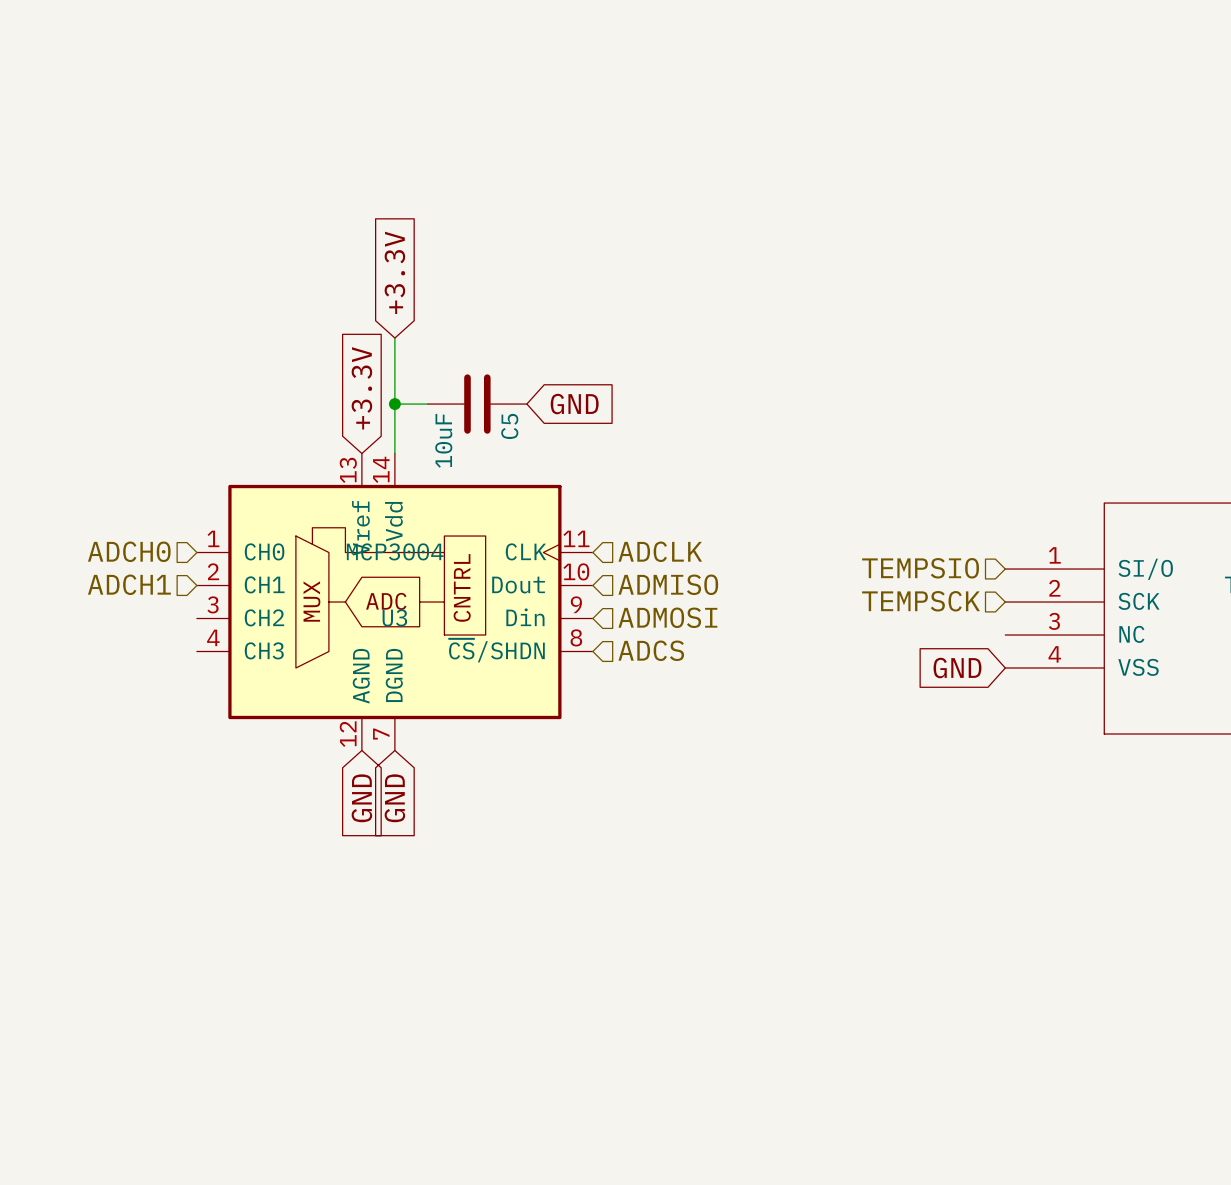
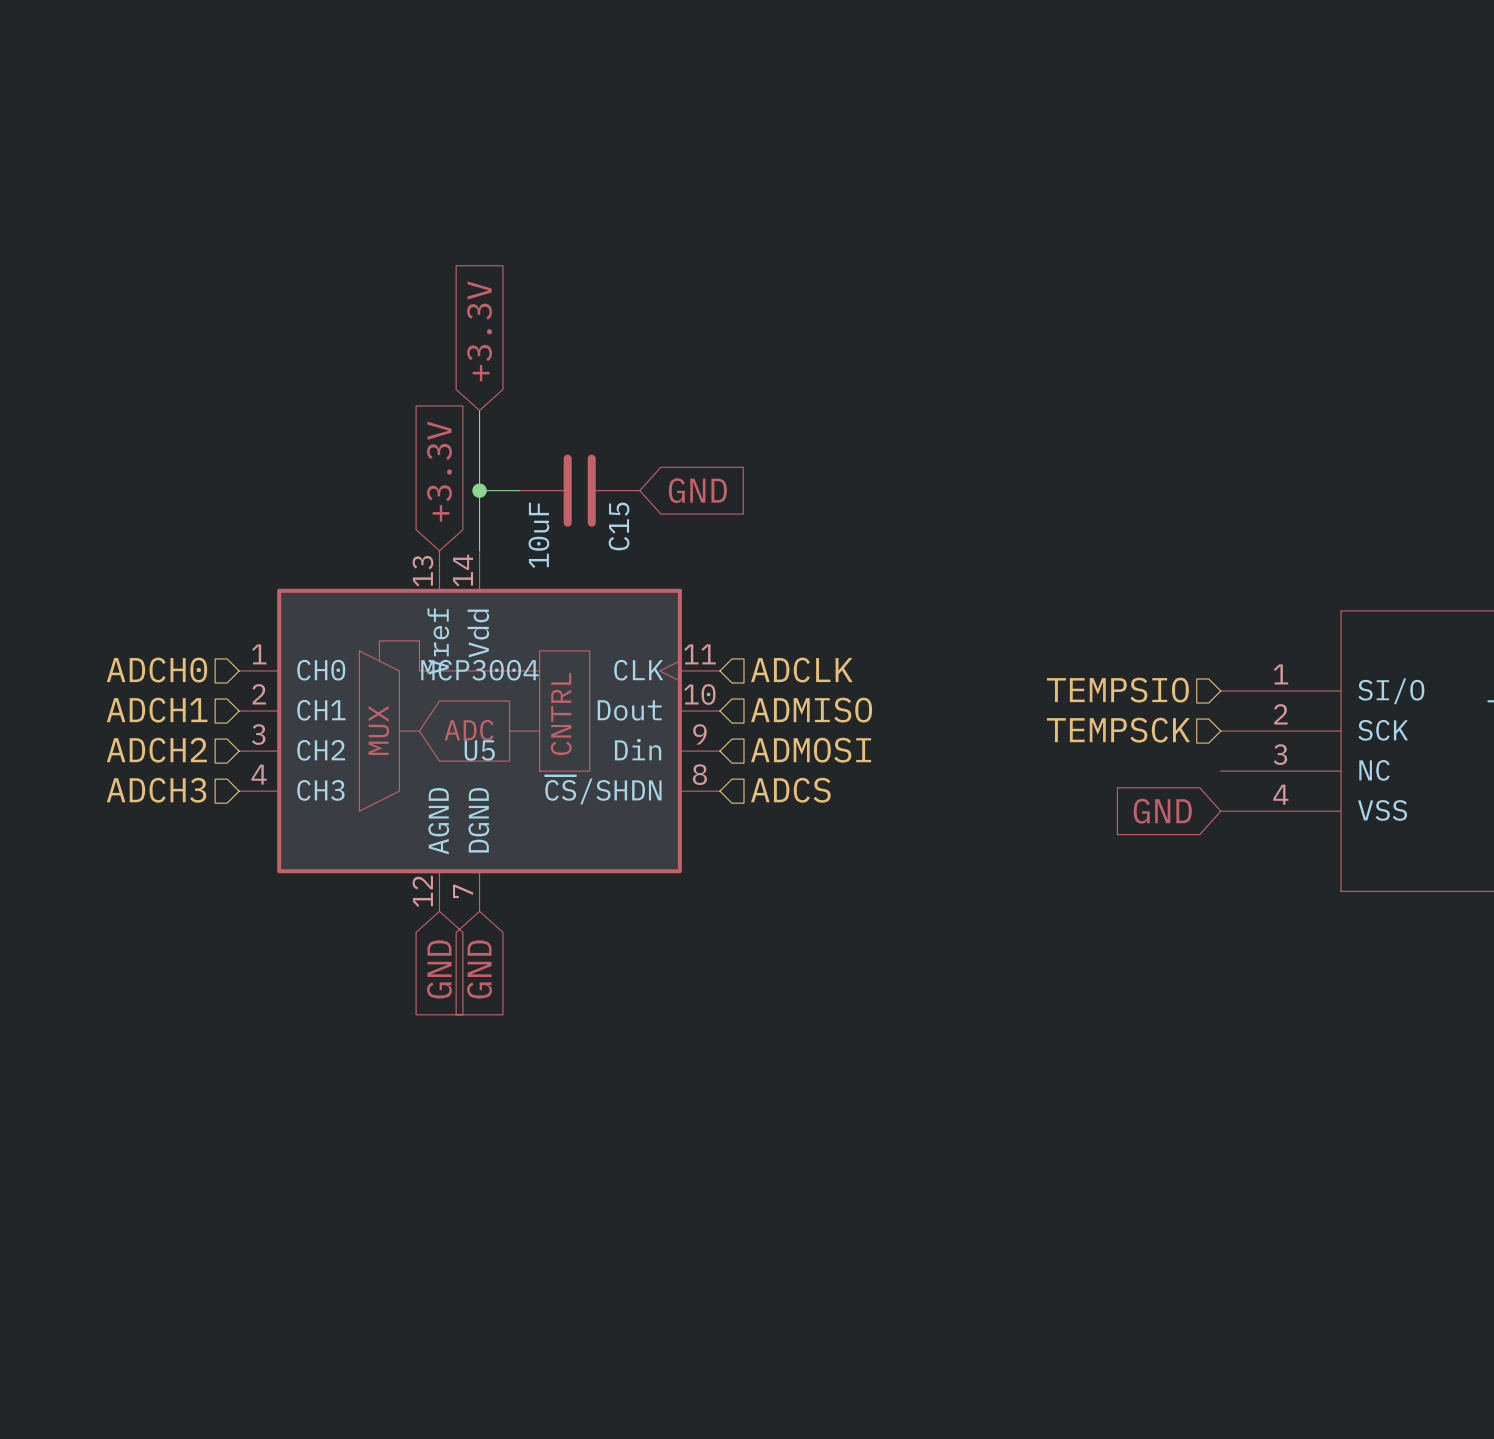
C5 name: C5 (509, 426) -> C15 (619, 526)
hierarchical label: none -> ADCH2 (156, 750)
U3 name: U3 (394, 617) -> U5 (479, 750)
hierarchical label: none -> ADCH3 (156, 790)

